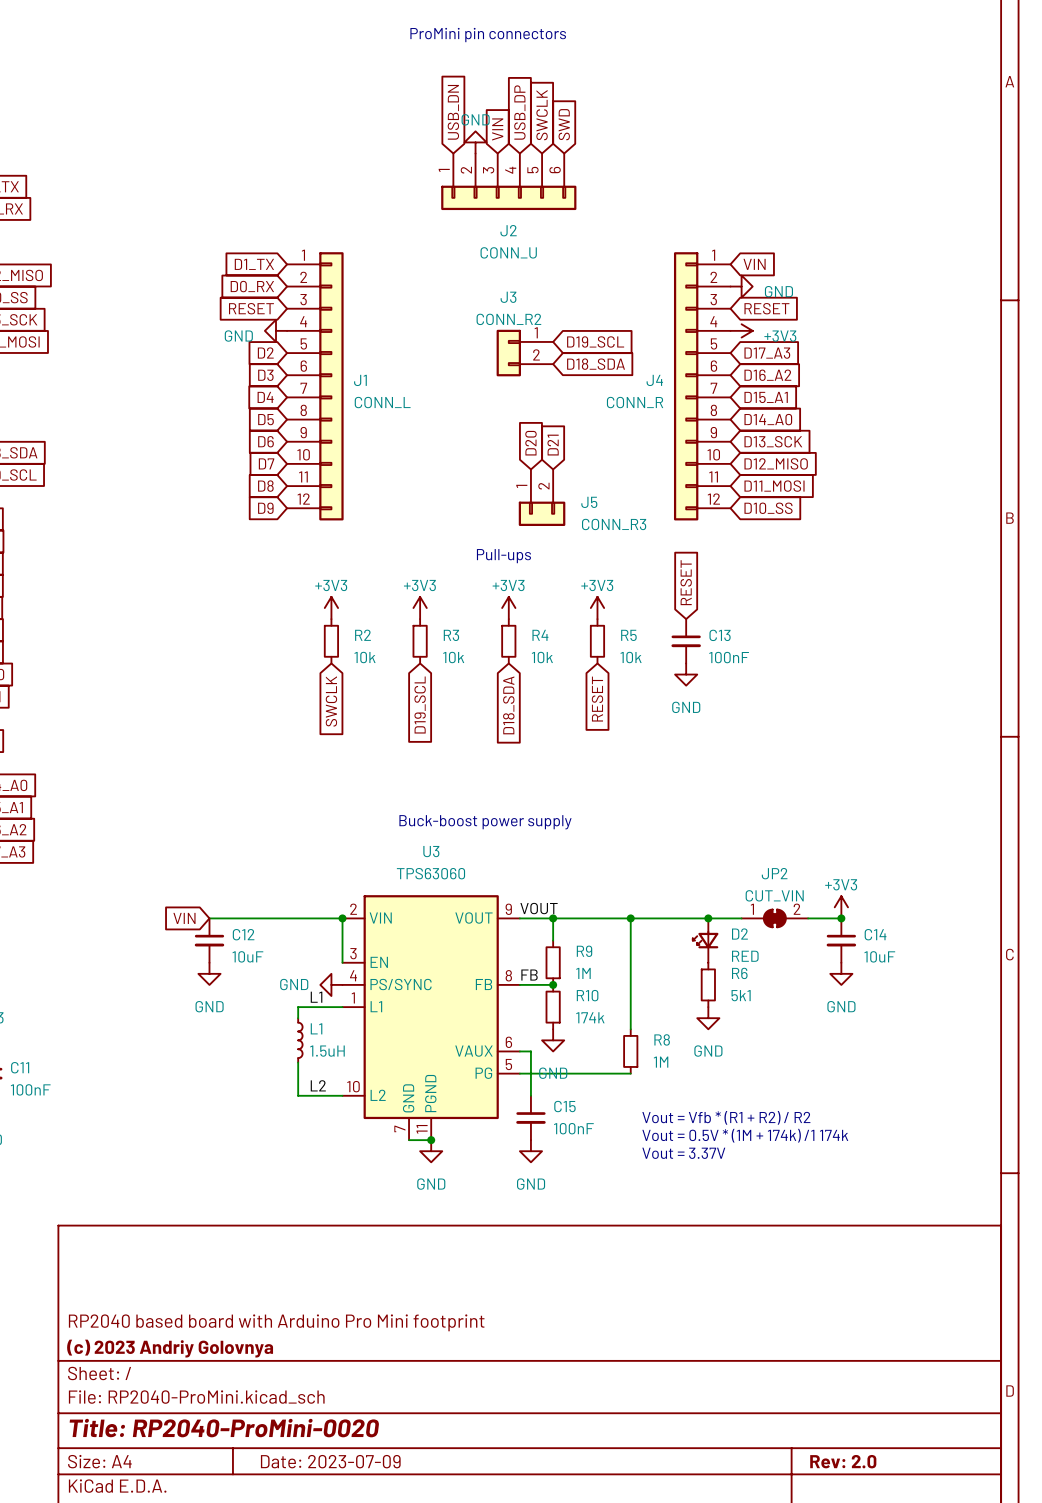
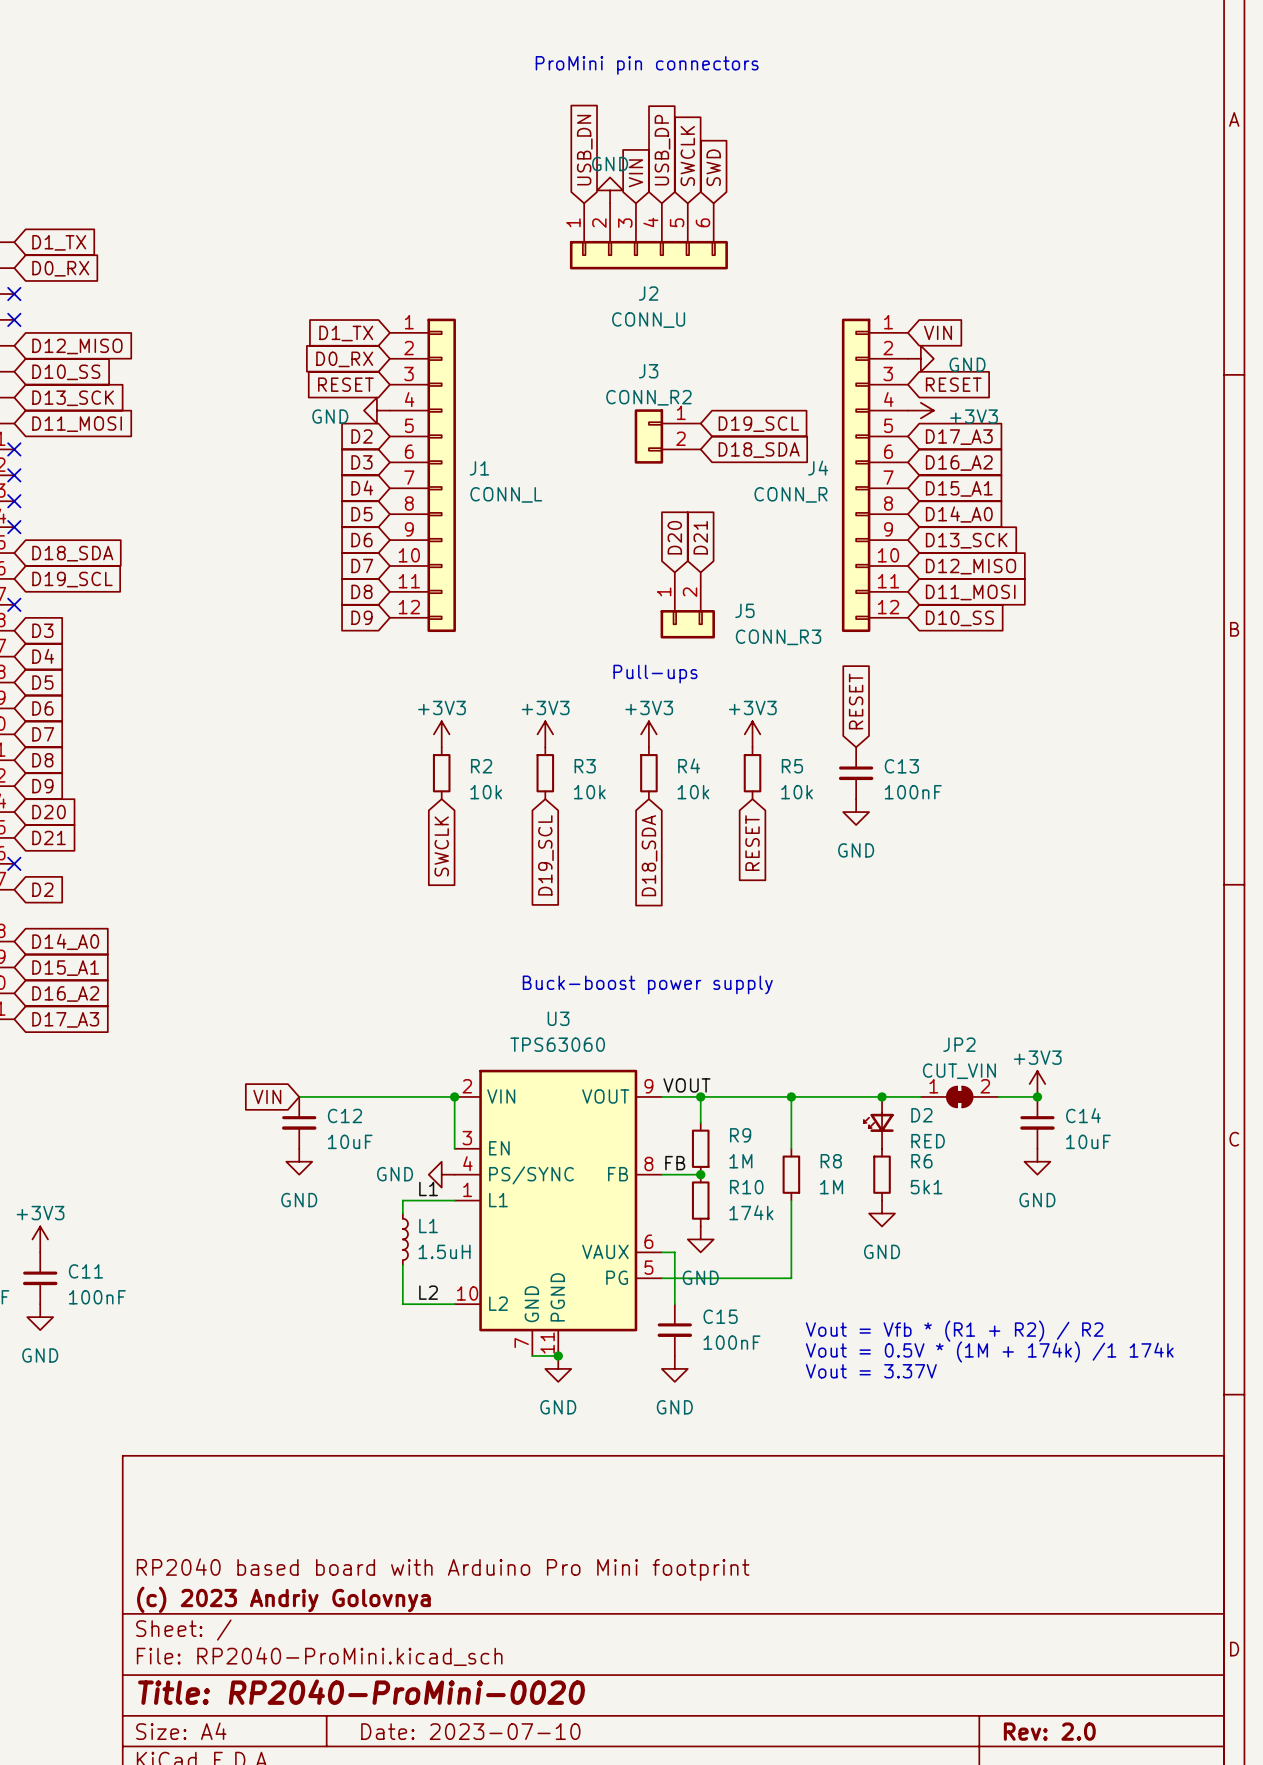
wire: (630, 962) (630, 1007) -> (791, 1226) (791, 1278)
R8 position: (630, 1051) -> (791, 1174)
title block: Date: 2023-07-09 (330, 1461) -> Date: 2023-07-10 (470, 1731)

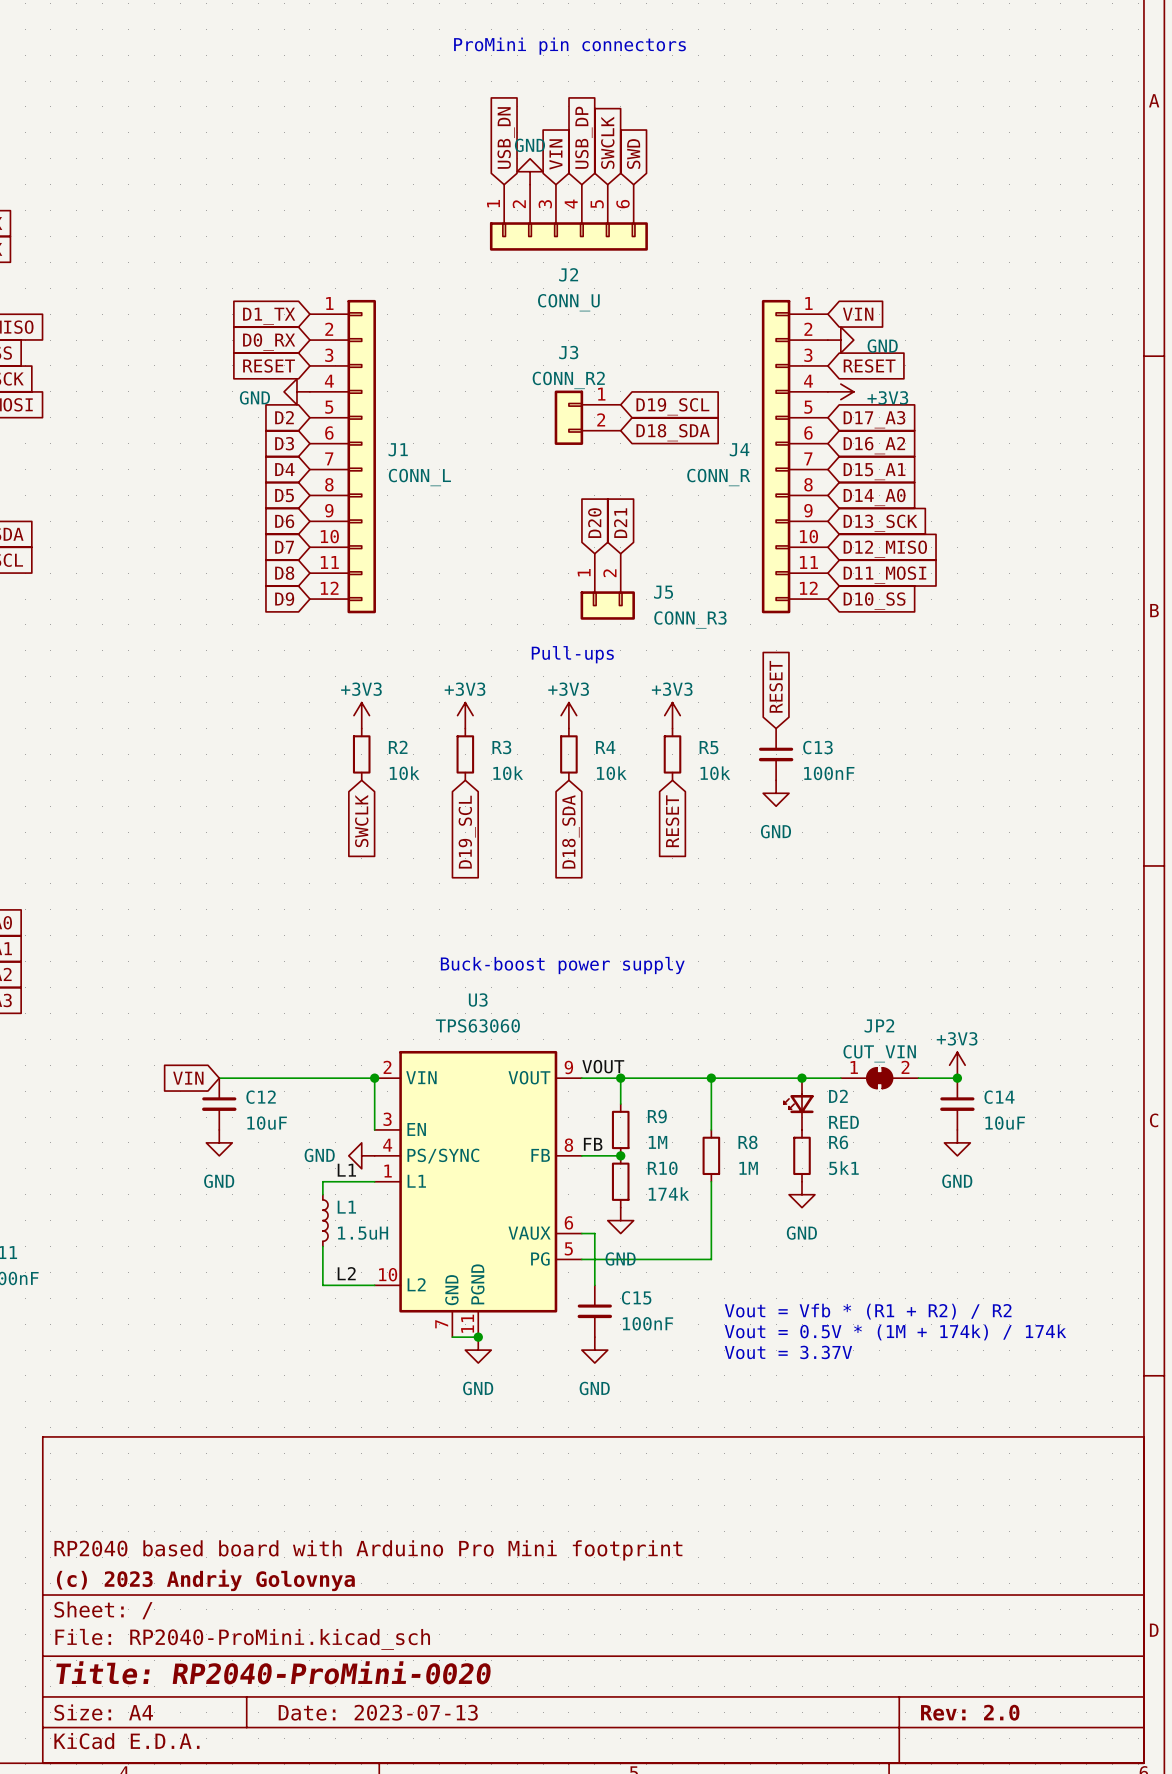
text: Vout = 0.5V * (1M + 174k) /1 174k (989, 1351) -> Vout = 0.5V * (1M + 174k) / 174k (895, 1332)
title block: Date: 2023-07-10 (470, 1731) -> Date: 2023-07-13 (378, 1712)

